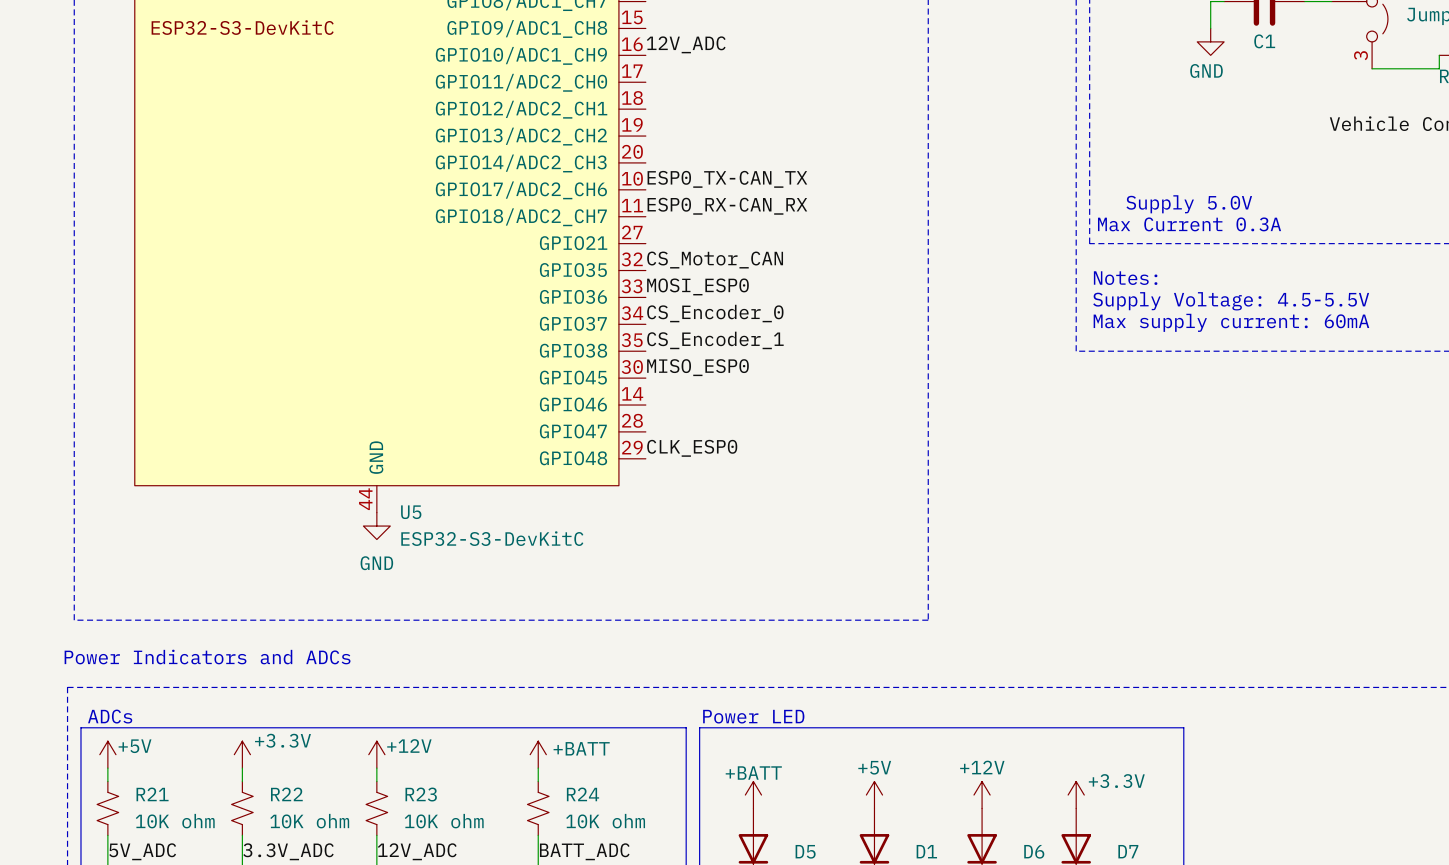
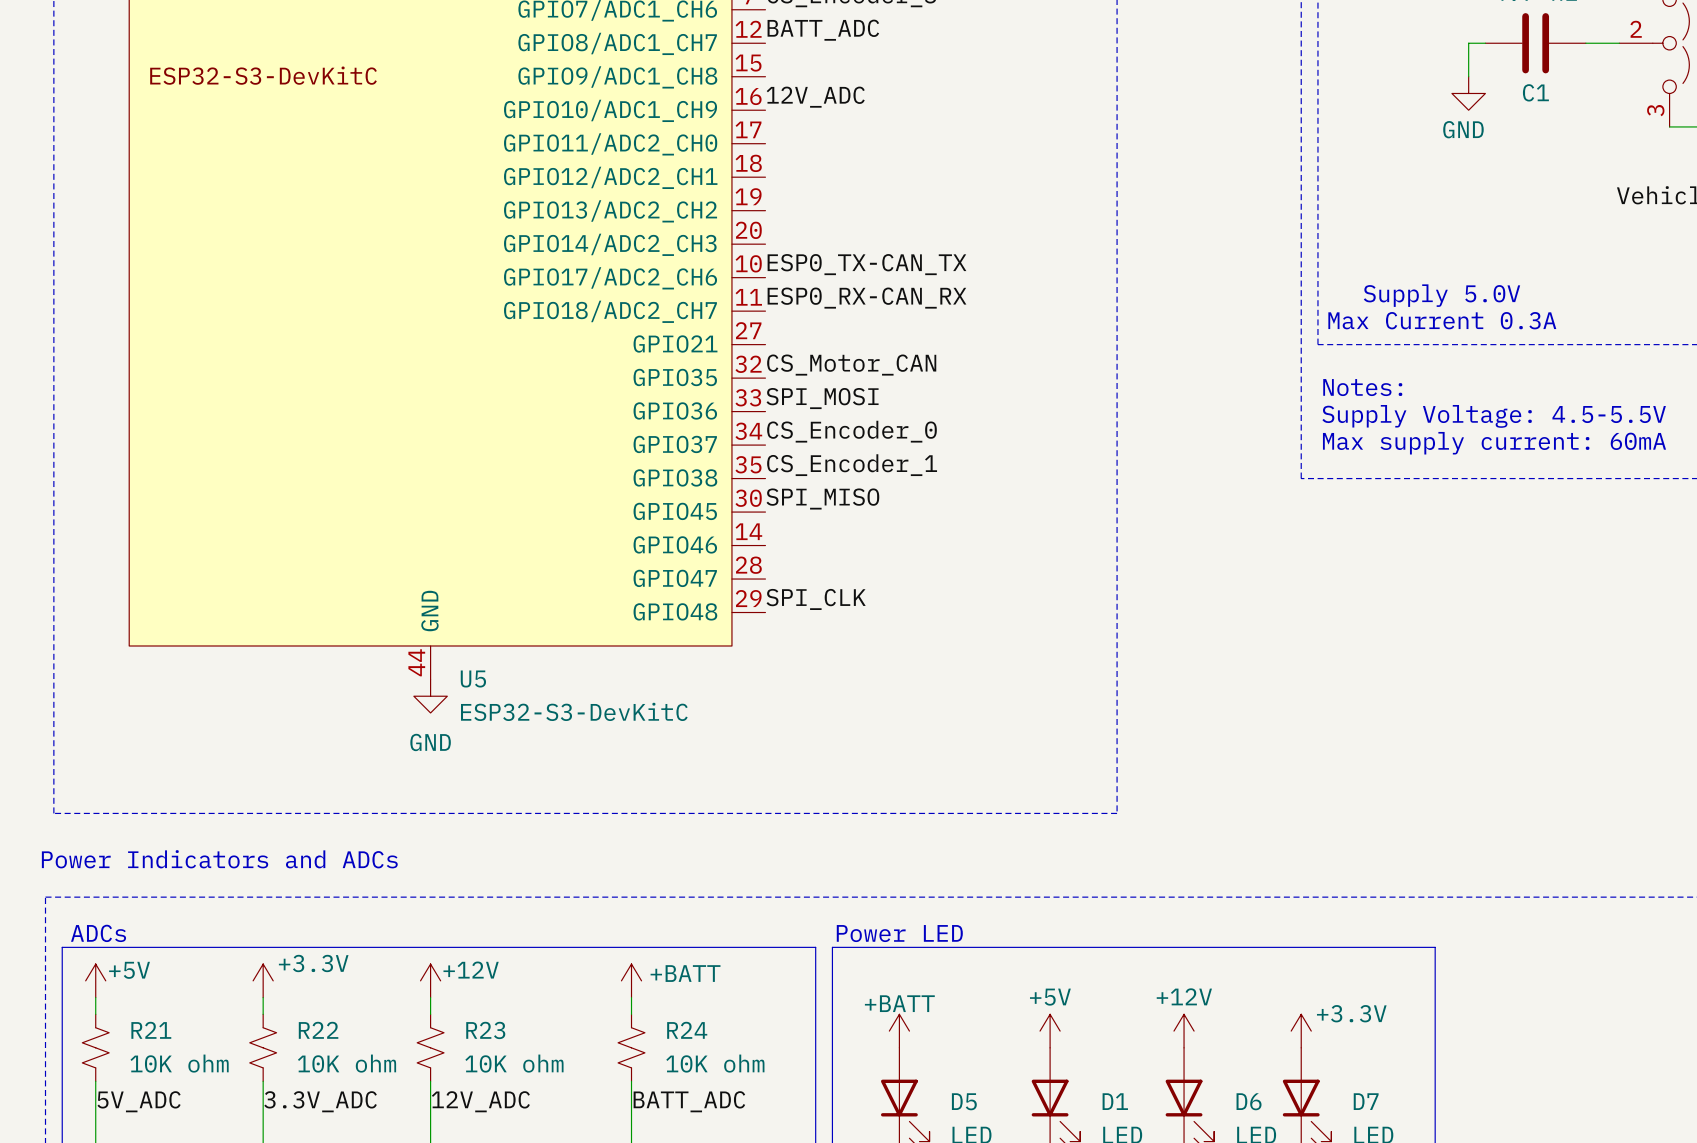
label: MOSI_ESP0 (697, 286) -> SPI_MOSI (822, 398)
label: MISO_ESP0 (697, 367) -> SPI_MISO (822, 498)
label: CLK_ESP0 (692, 448) -> SPI_CLK (816, 599)

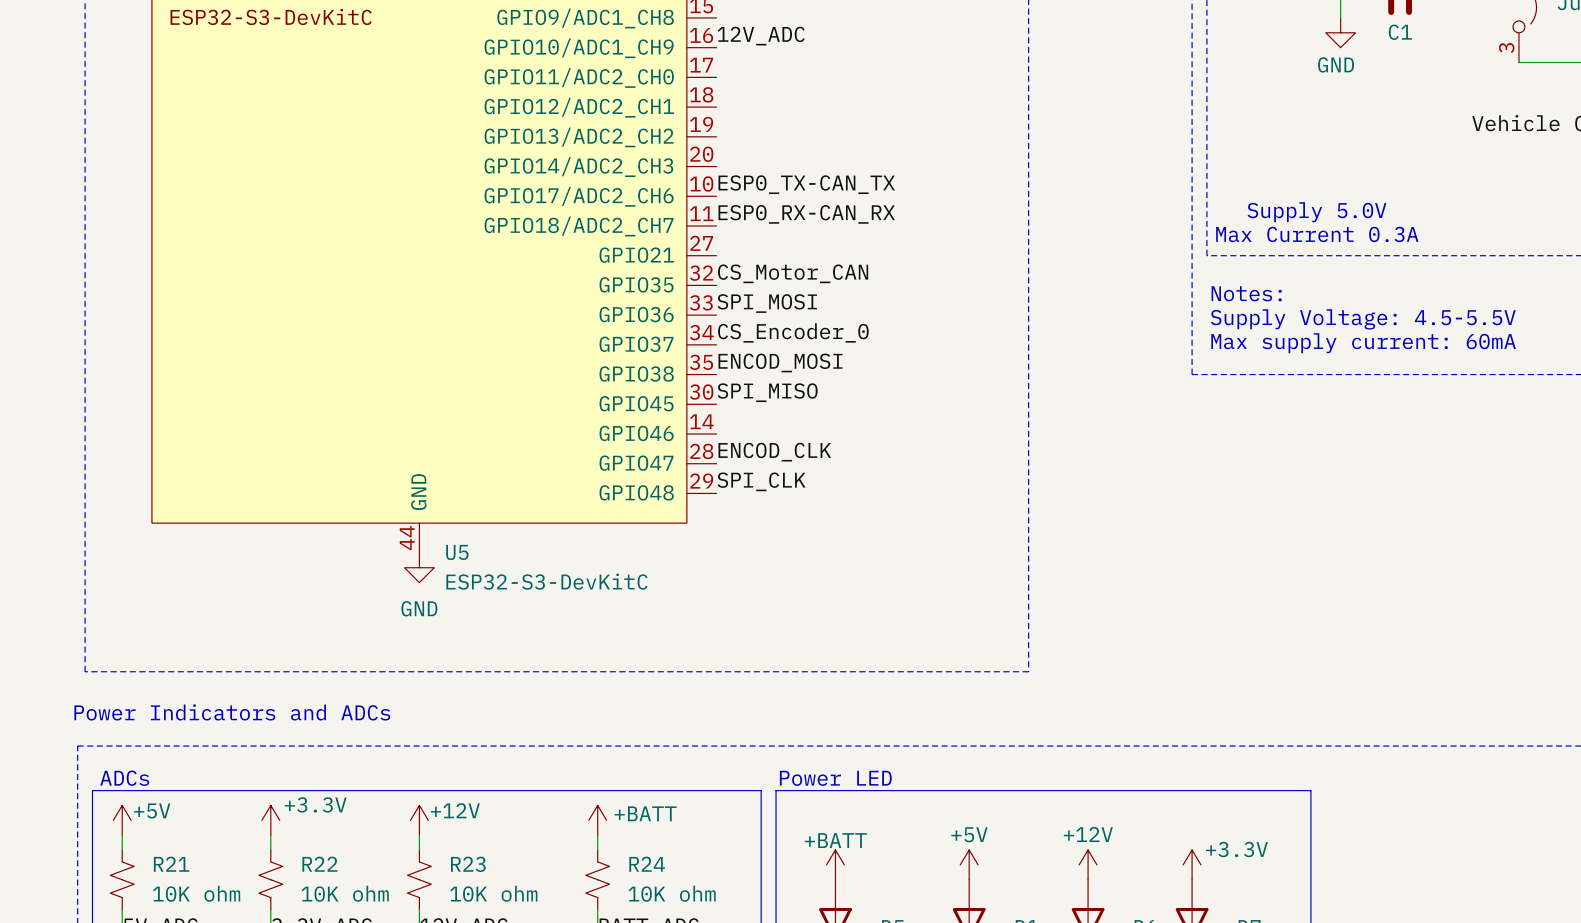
label: CS_Encoder_1 (852, 465) -> ENCOD_MOSI (780, 362)
label: none -> ENCOD_CLK (774, 452)

